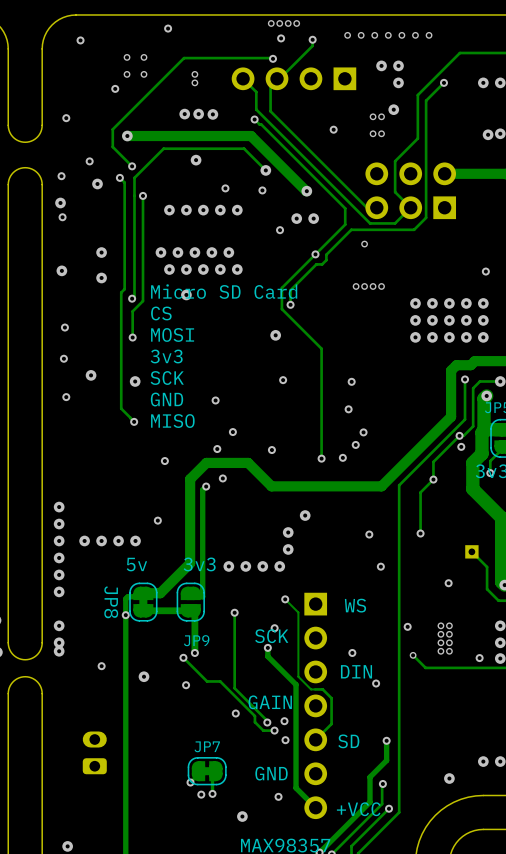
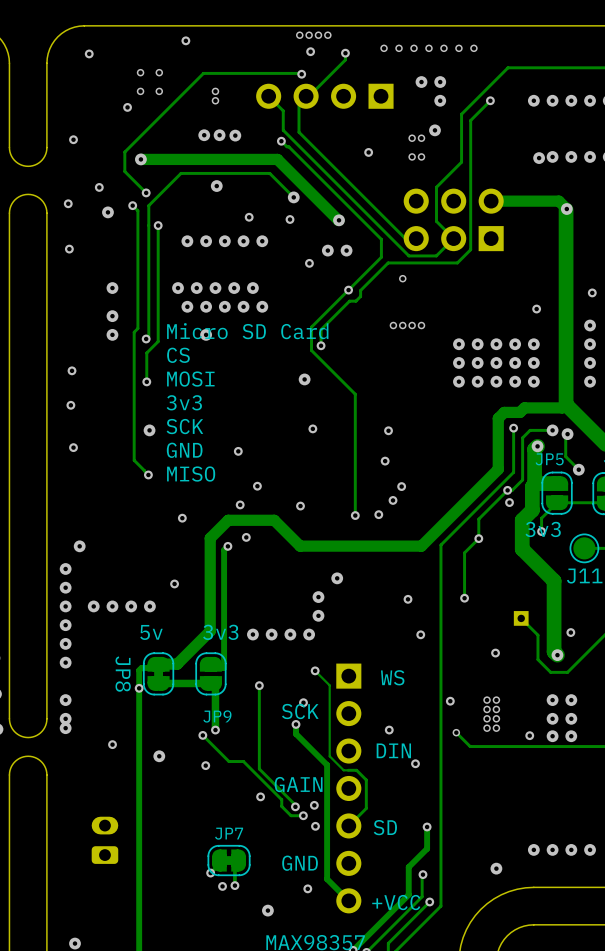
via: (60, 202) -> none
via: (61, 270) -> none
via: none -> (112, 334)
via: (91, 375) -> none
via: none -> (79, 546)

